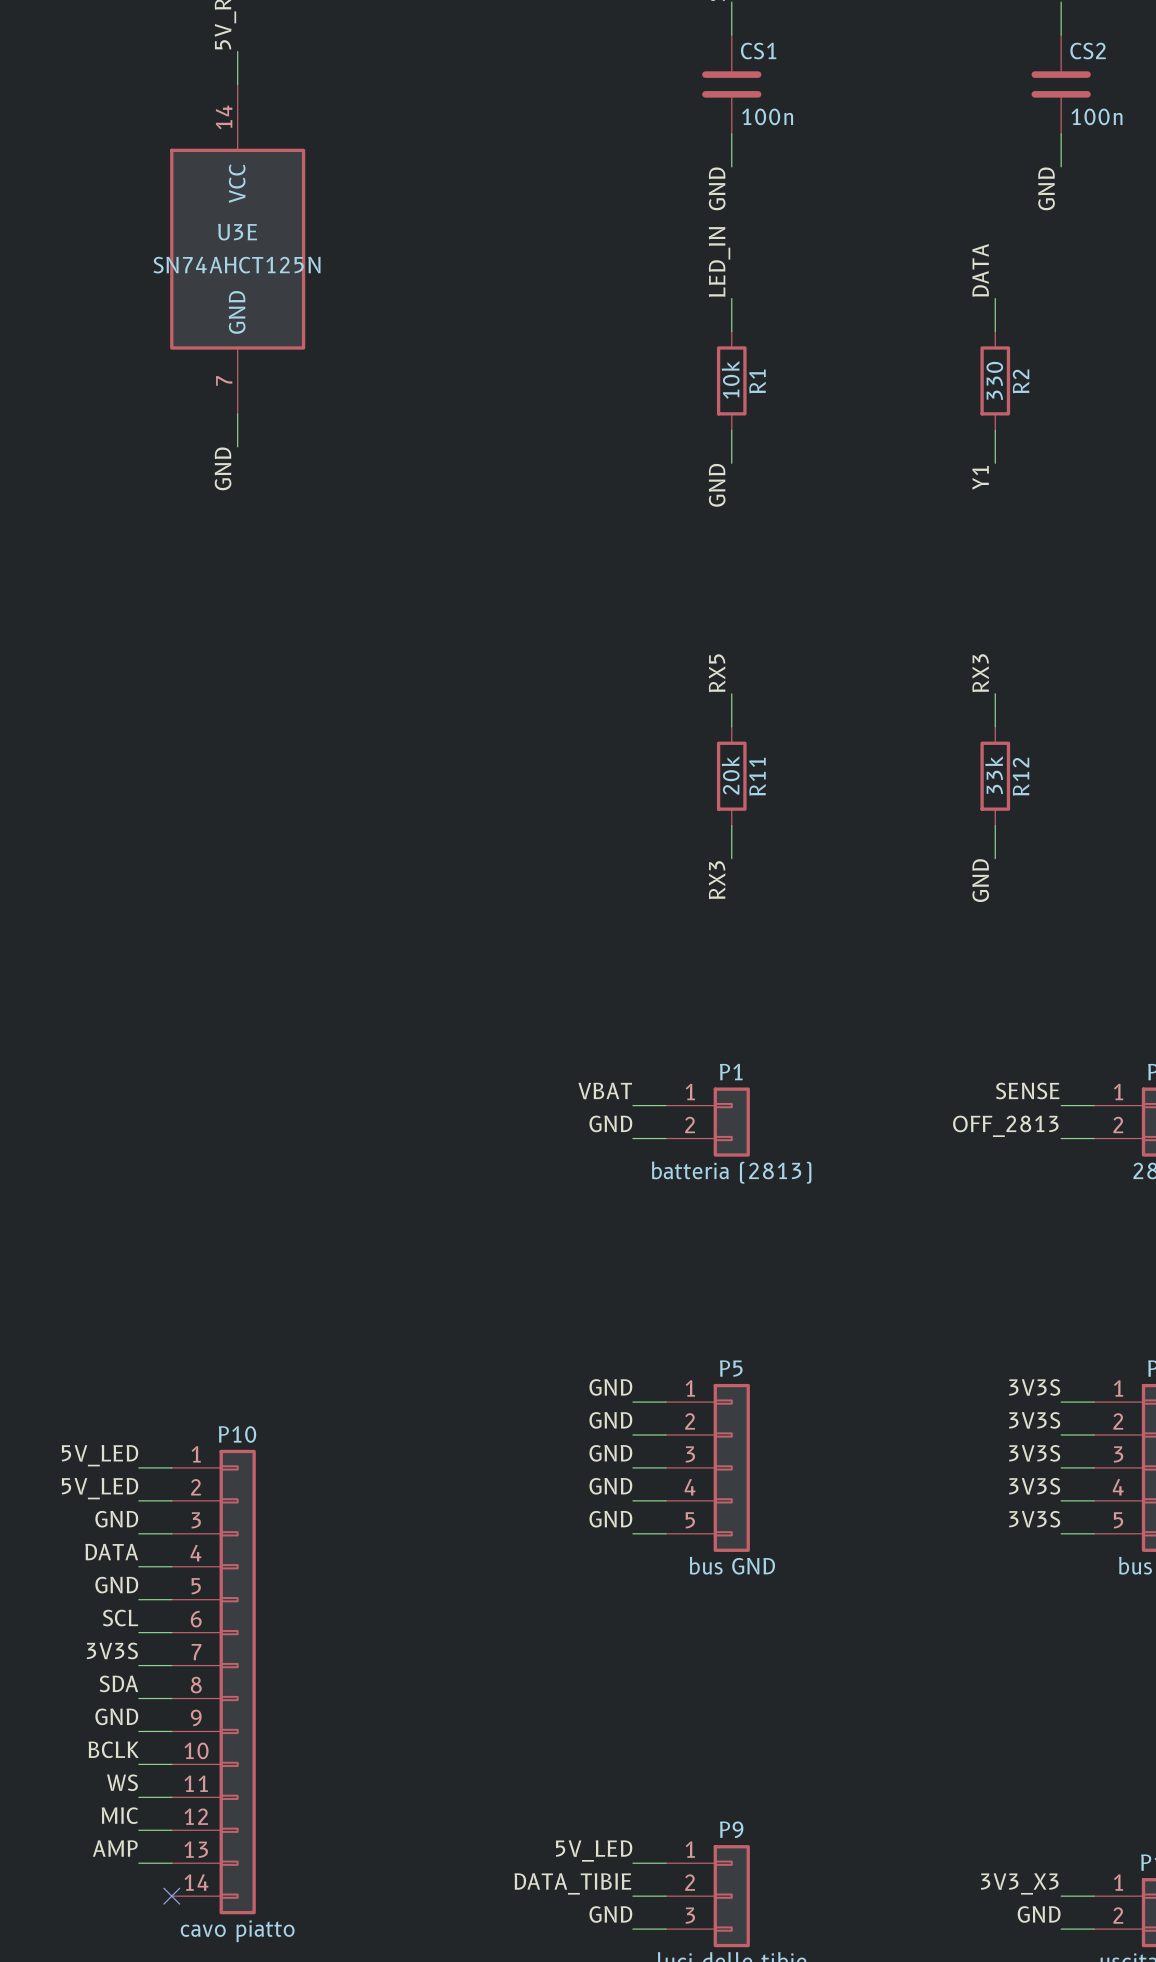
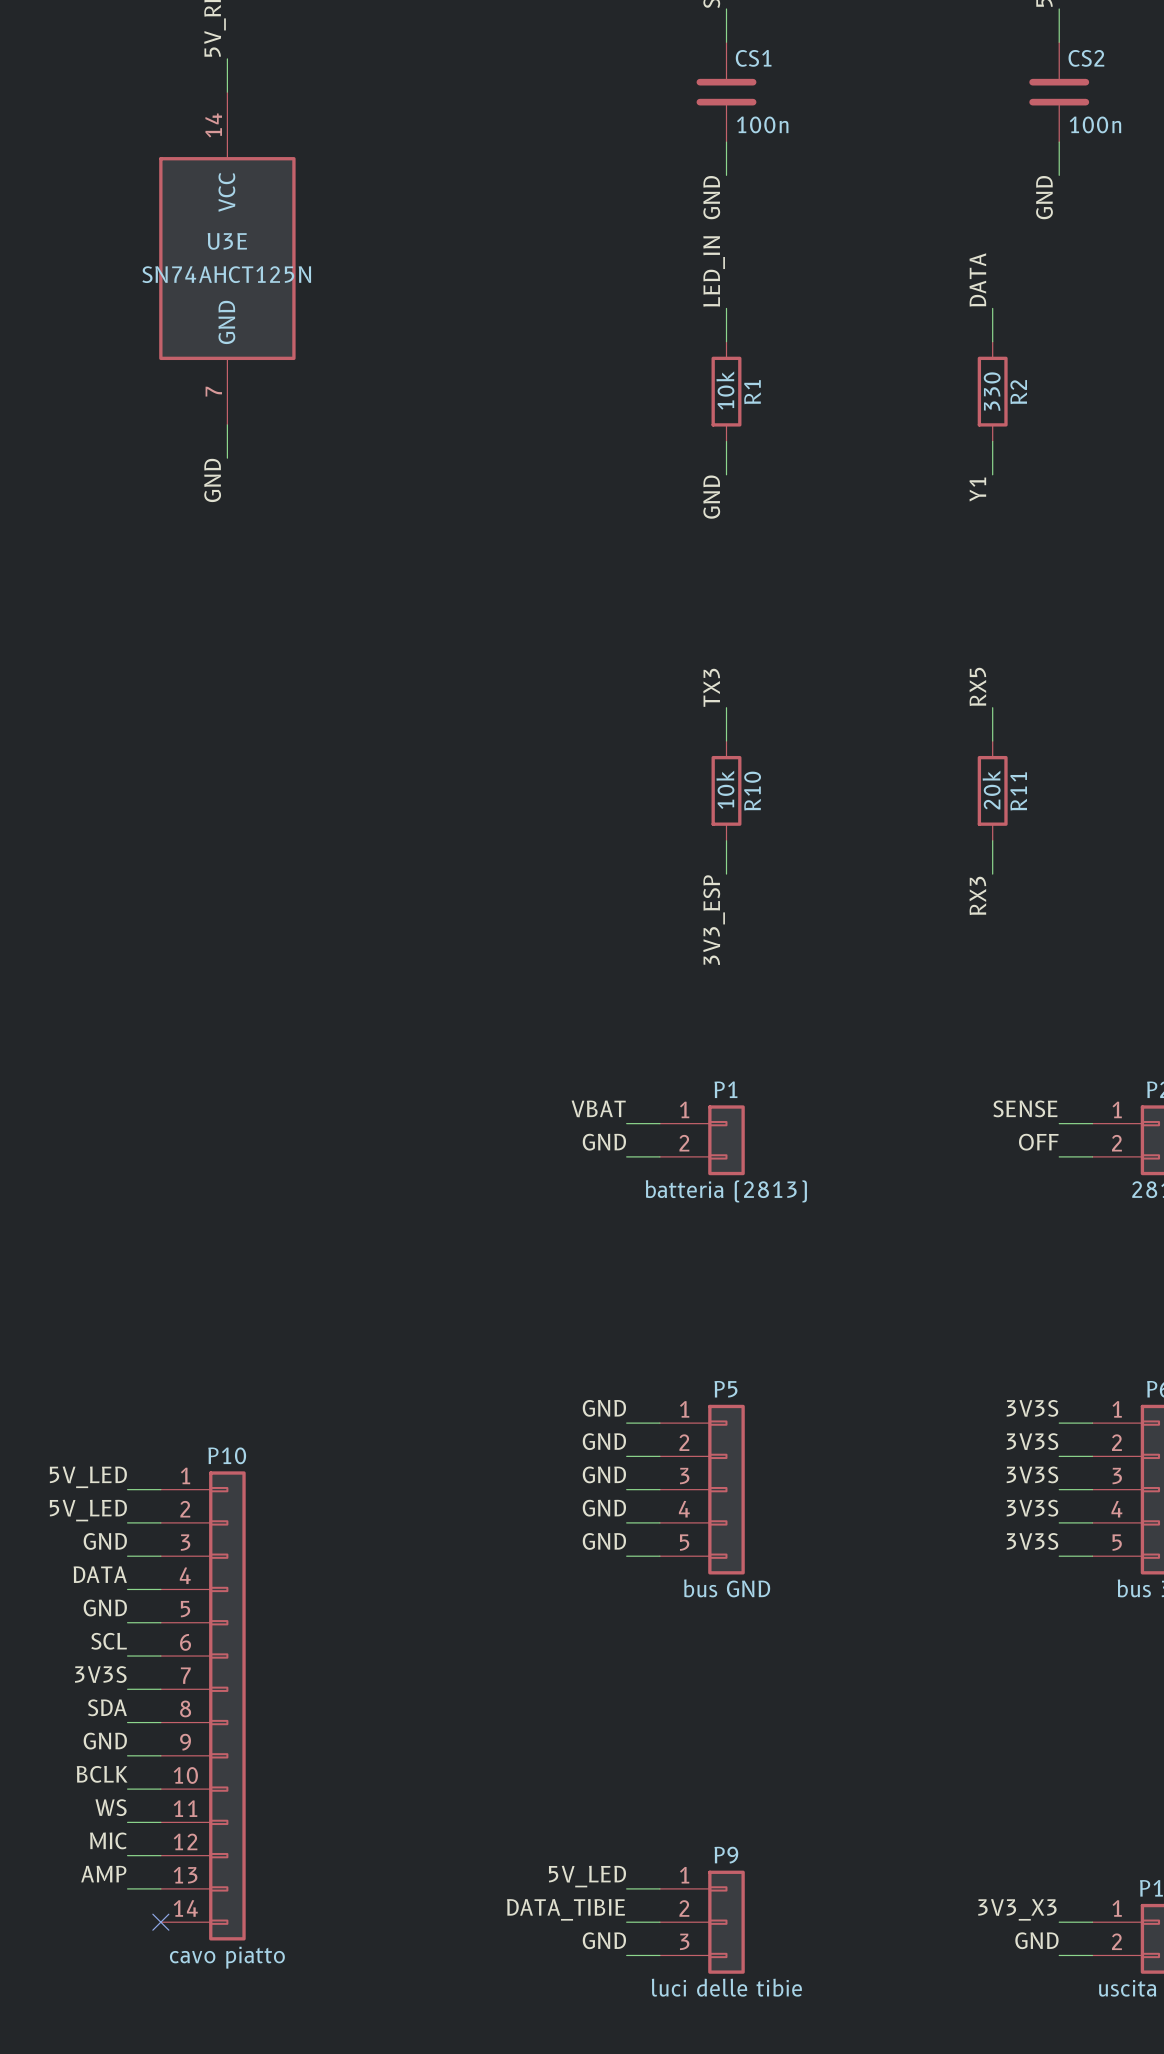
label: RX5 (717, 673) -> TX3 (711, 687)
label: RX3 (980, 673) -> RX5 (977, 686)
R11 value: 20k (730, 775) -> 10k (725, 789)
R12 value: 33k (994, 775) -> 20k (991, 790)
R11 name: R11 (757, 776) -> R10 (752, 791)
R12 name: R12 (1021, 776) -> R11 (1018, 791)
label: RX3 (717, 880) -> 3V3_ESP (714, 920)
label: GND (980, 880) -> RX3 (977, 895)
label: OFF_2813 (1005, 1126) -> OFF (1038, 1142)

